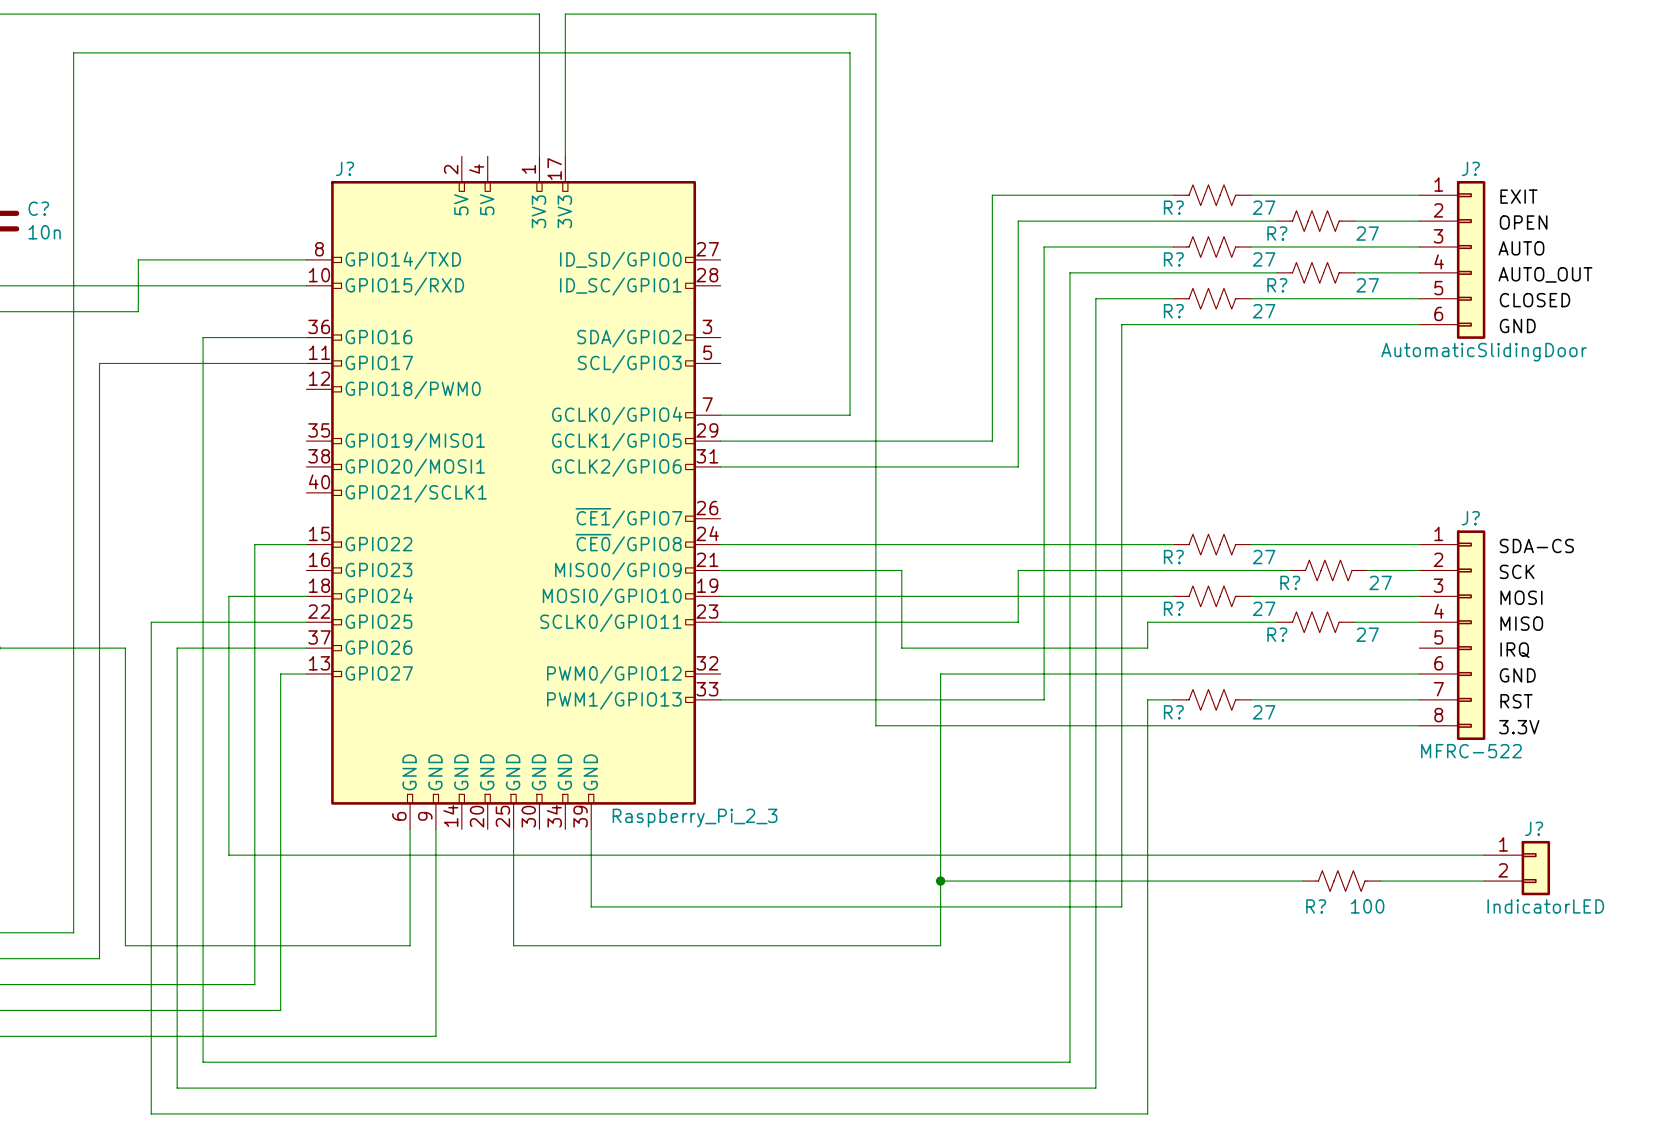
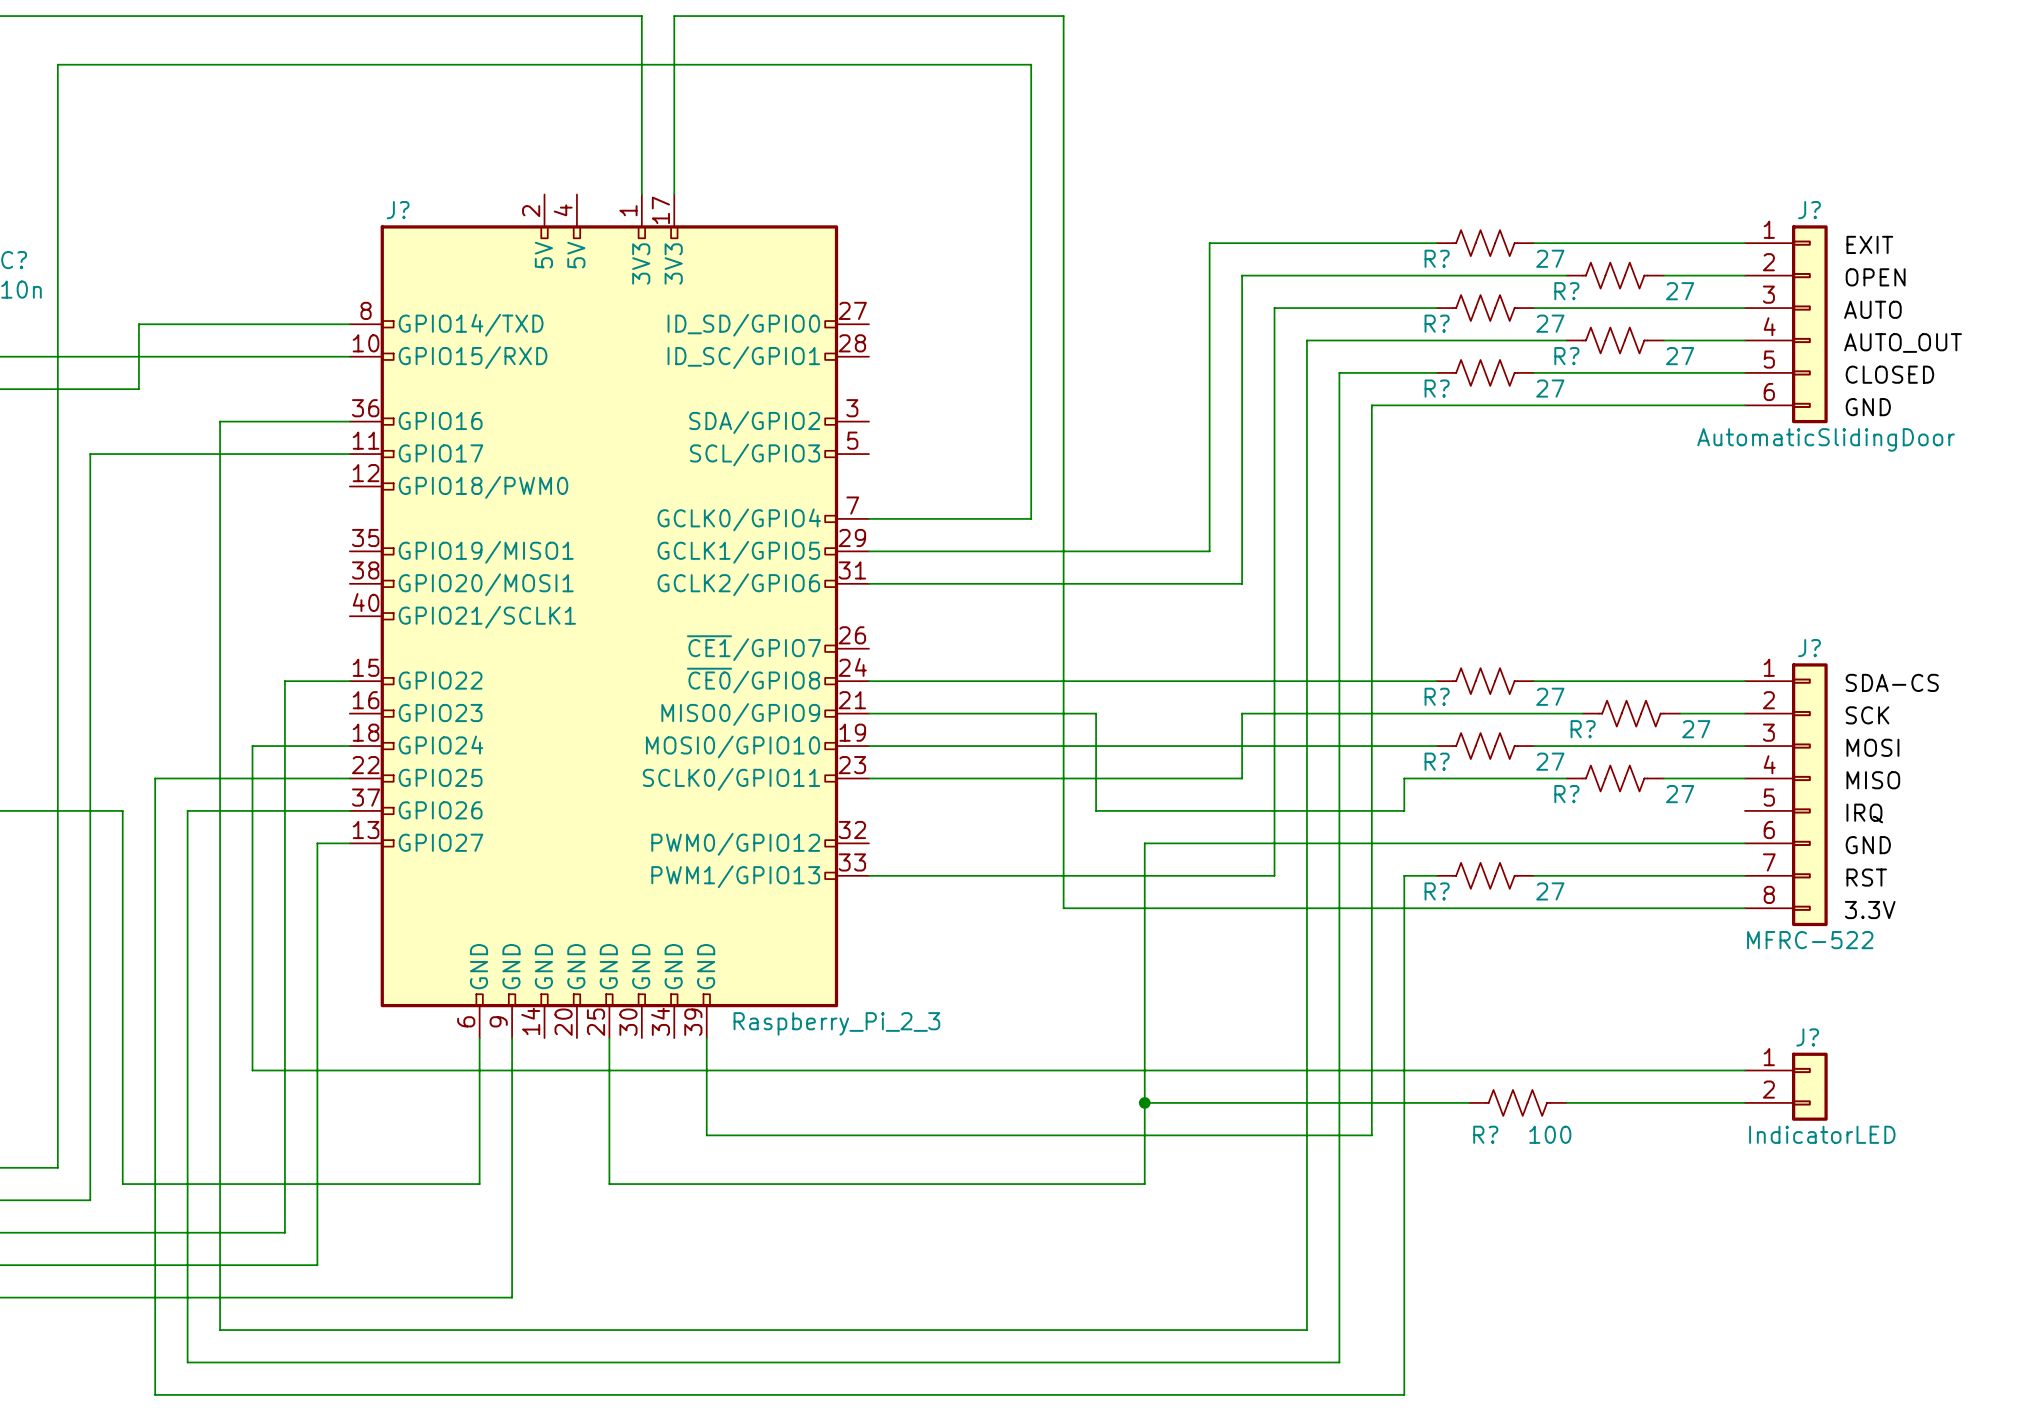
J? position: (1517, 868) -> (1786, 1086)
R? position: (1341, 881) -> (1517, 1102)

